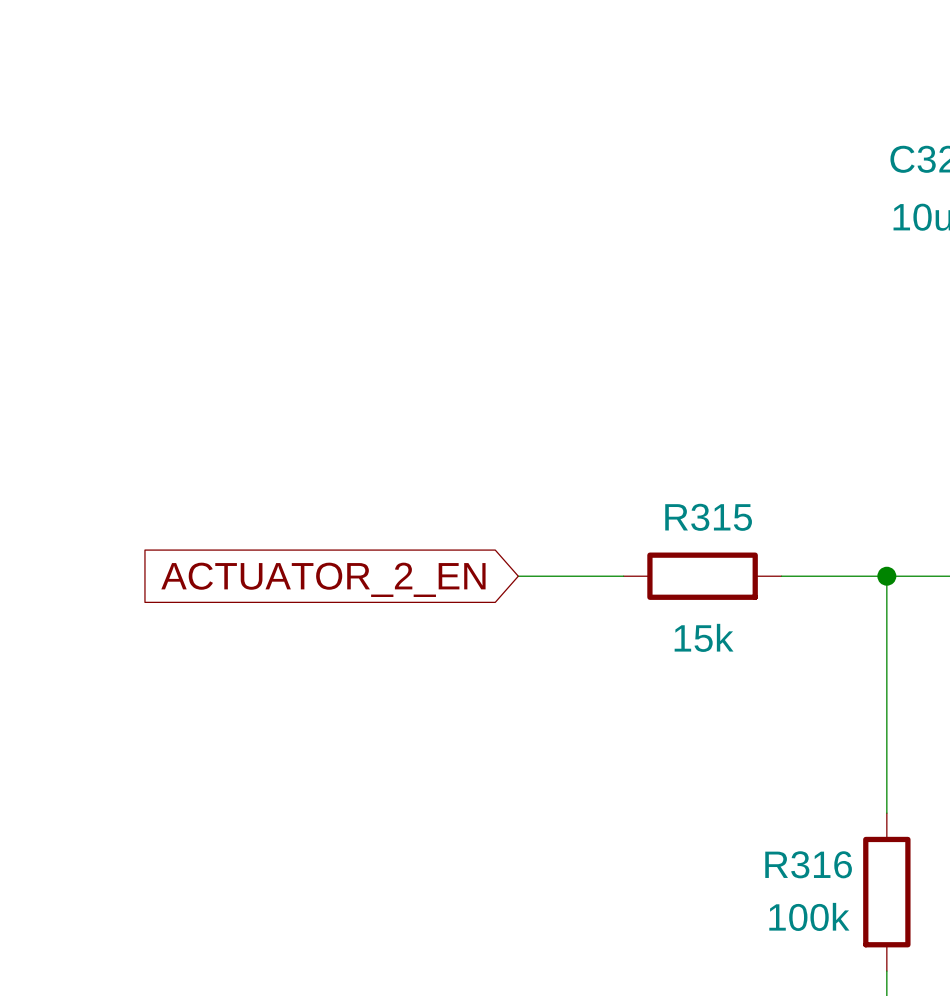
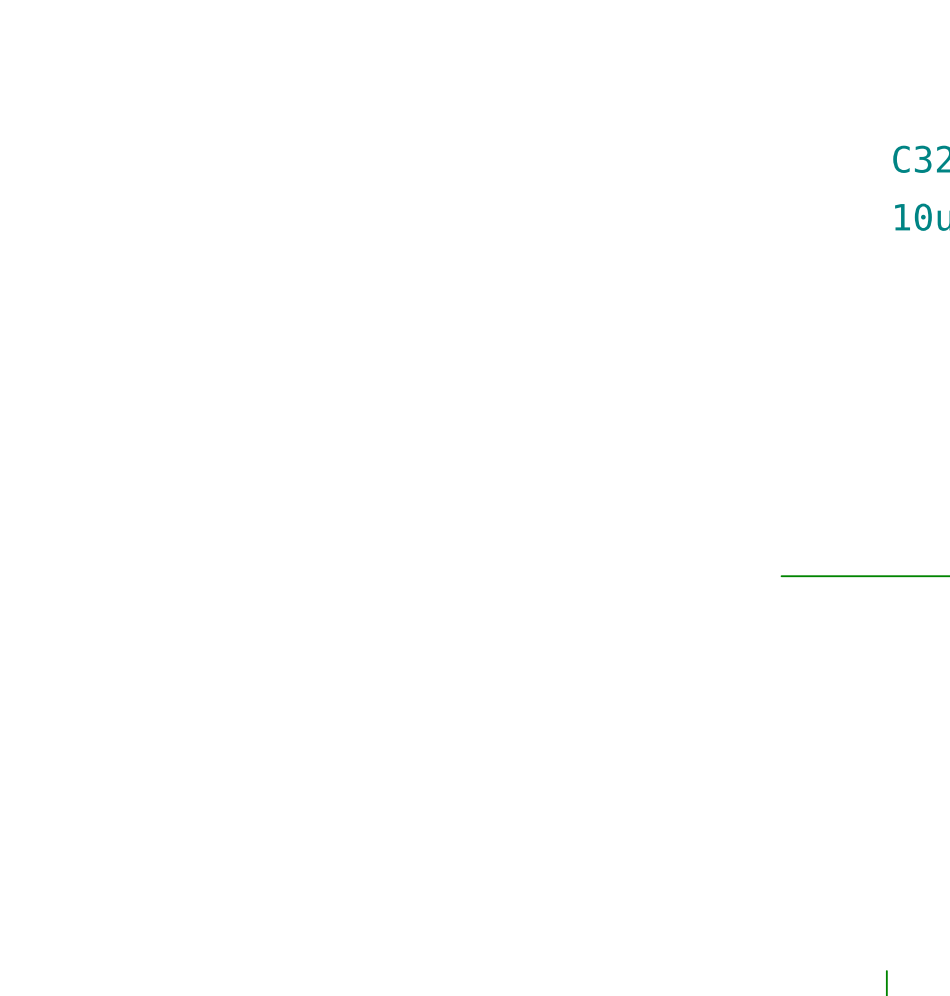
wire: (518, 576) (623, 576) -> none
R315: 15k (702, 576) -> none
wire: (886, 576) (886, 813) -> none
junction: (886, 576) -> none
global label: ACTUATOR_2_EN (323, 579) -> none
R316: 100k (886, 892) -> none

